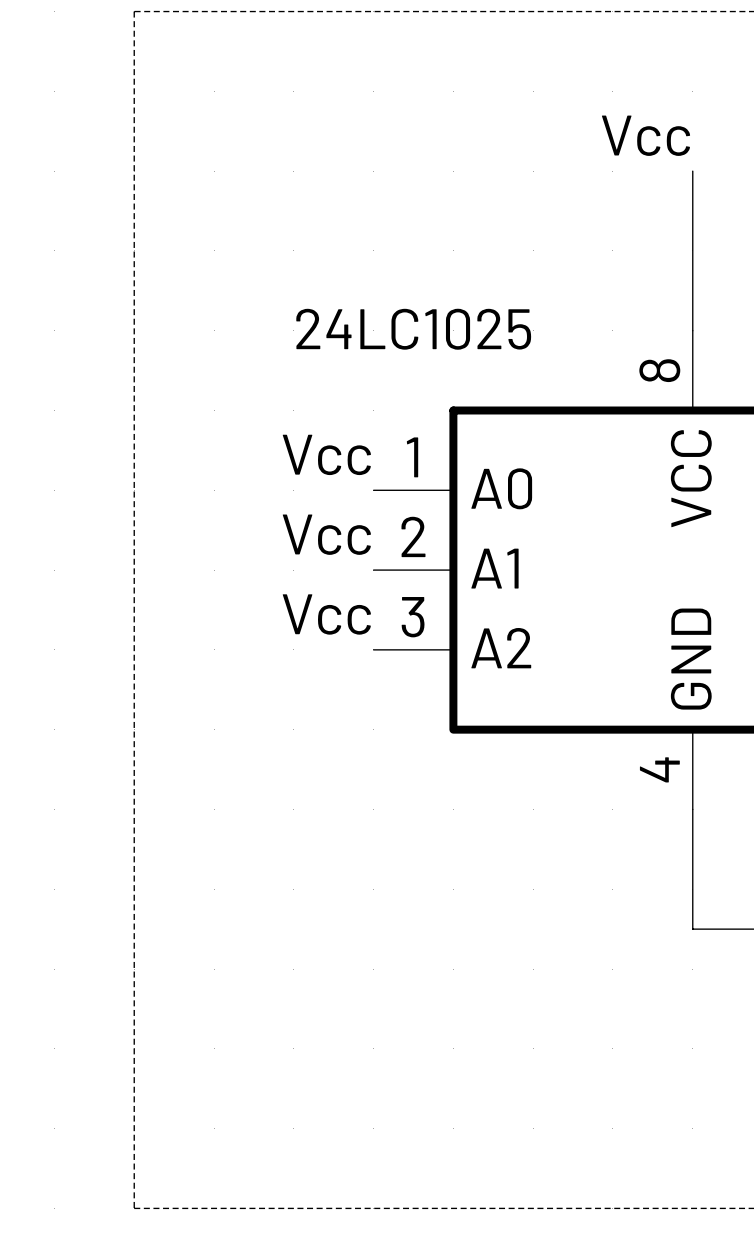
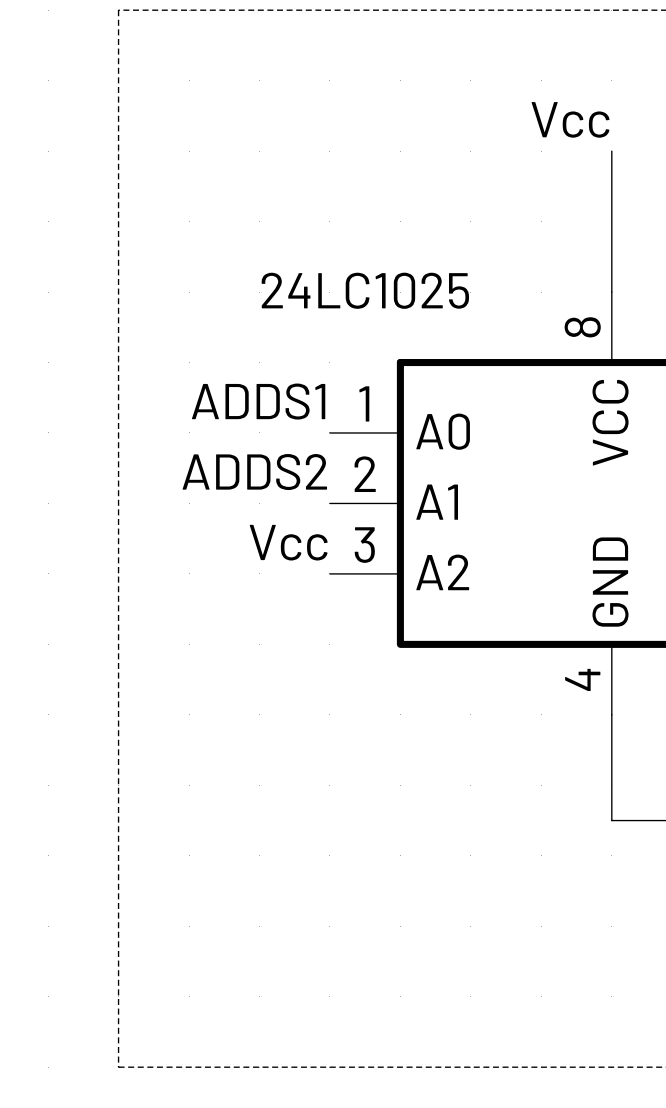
label: Vcc (326, 454) -> ADDS1 (258, 401)
label: Vcc (326, 534) -> ADDS2 (254, 472)

